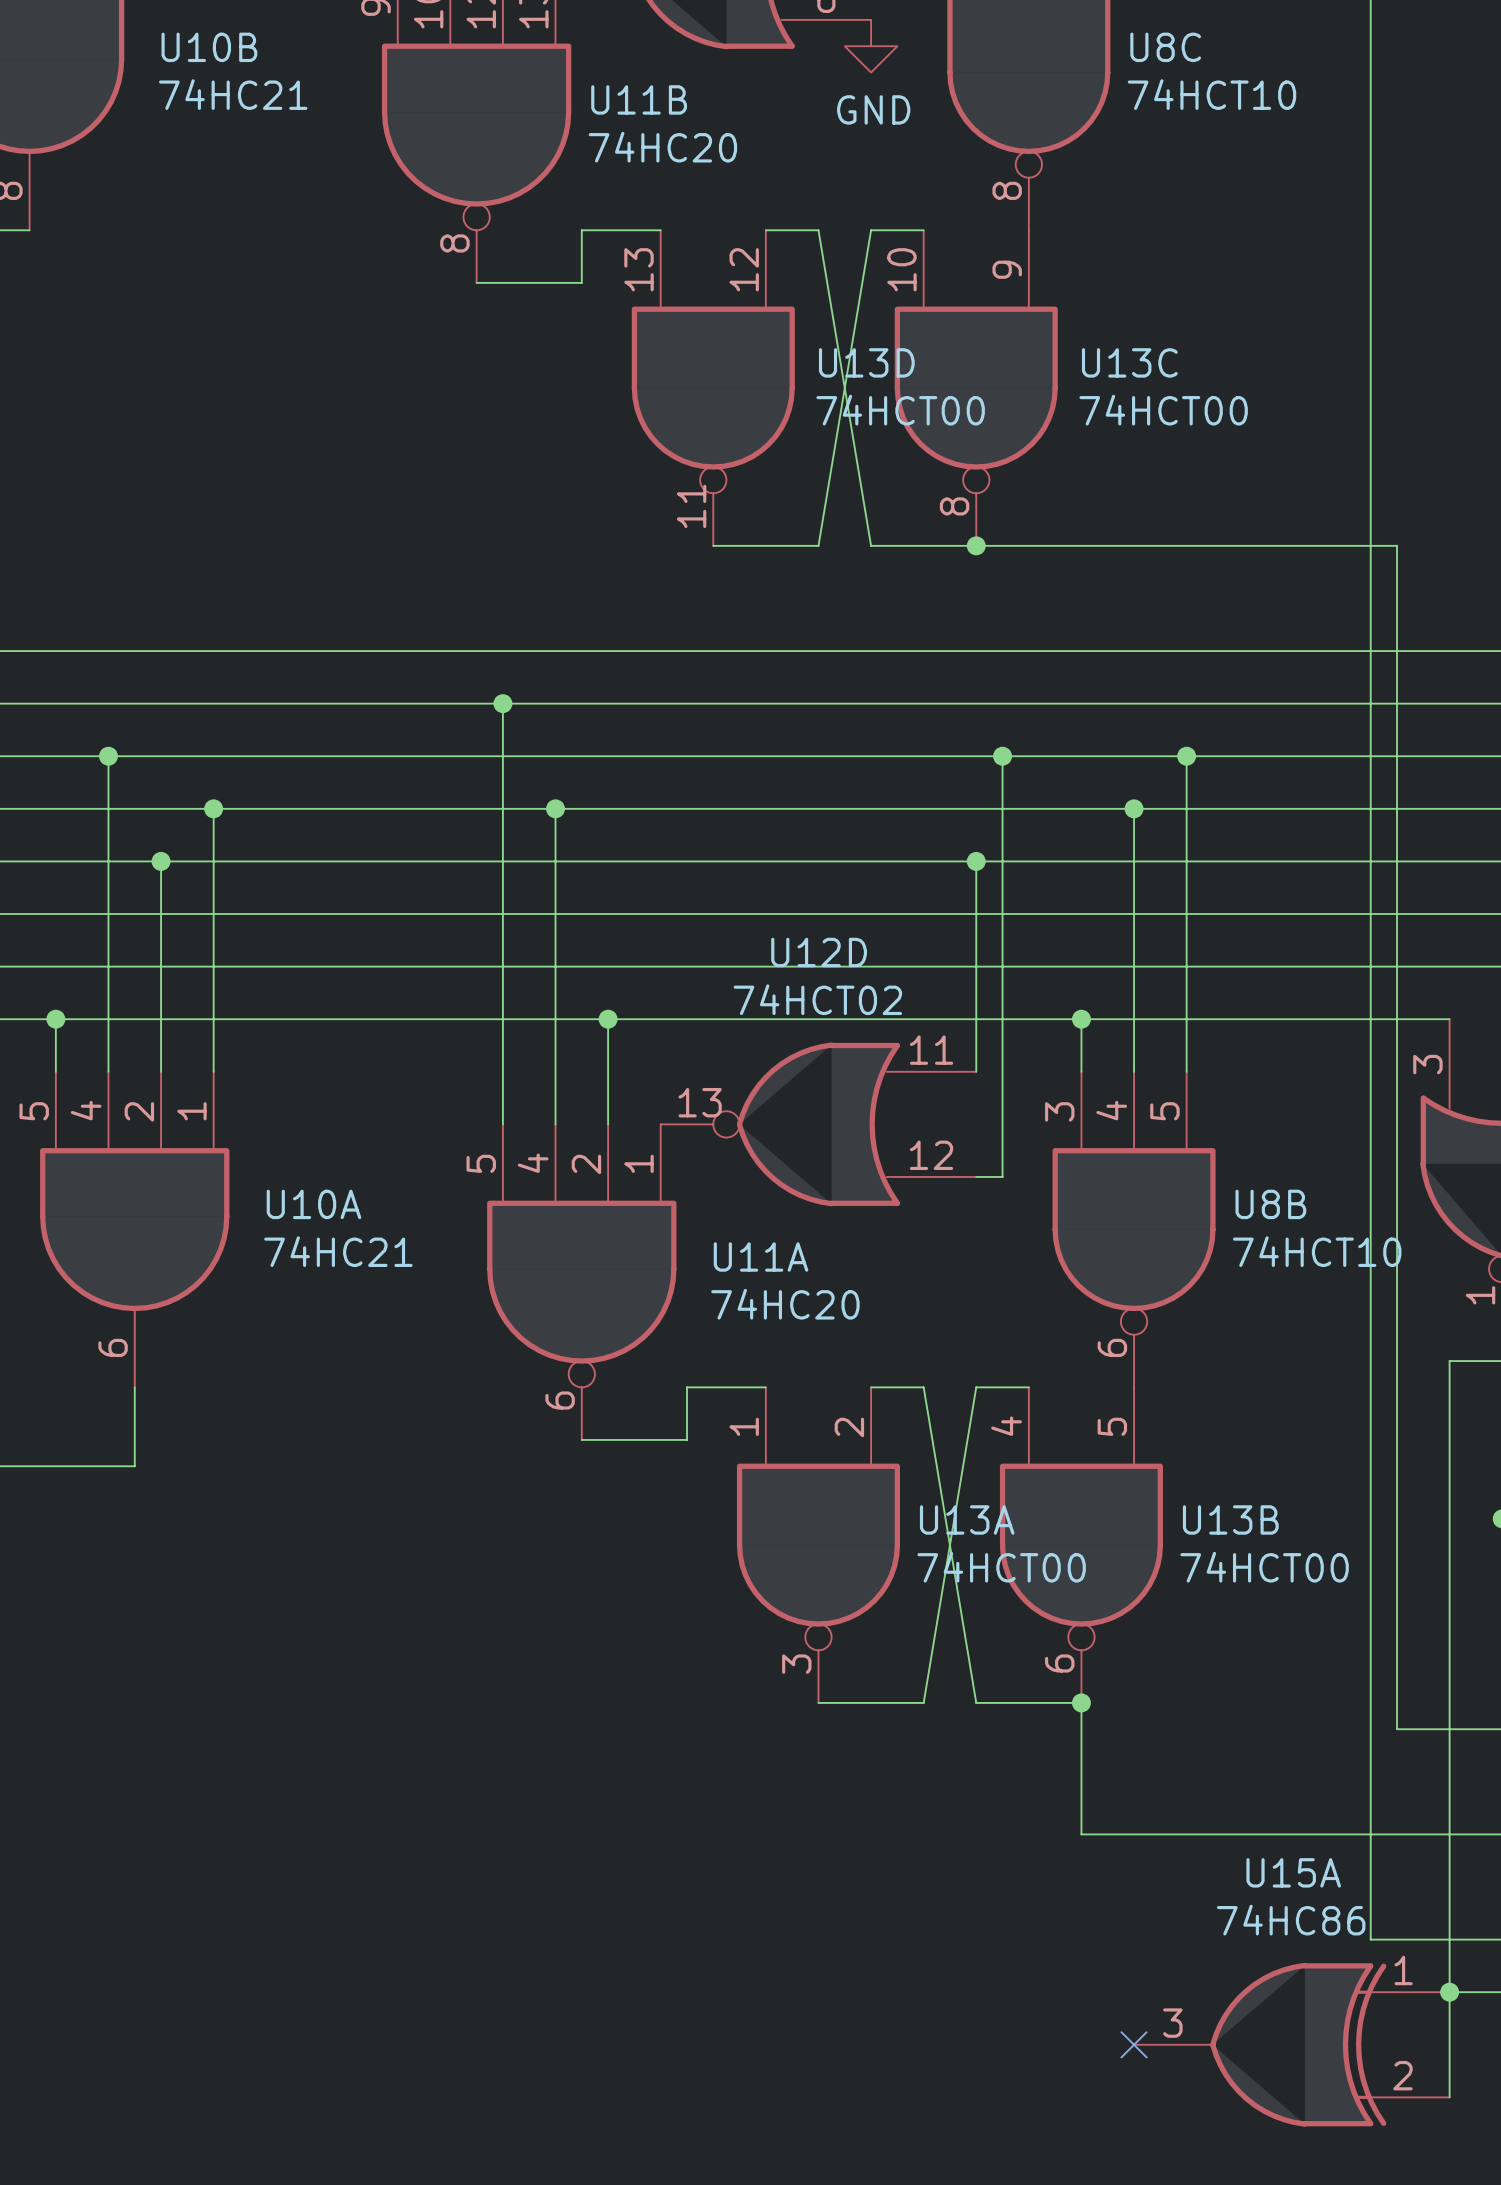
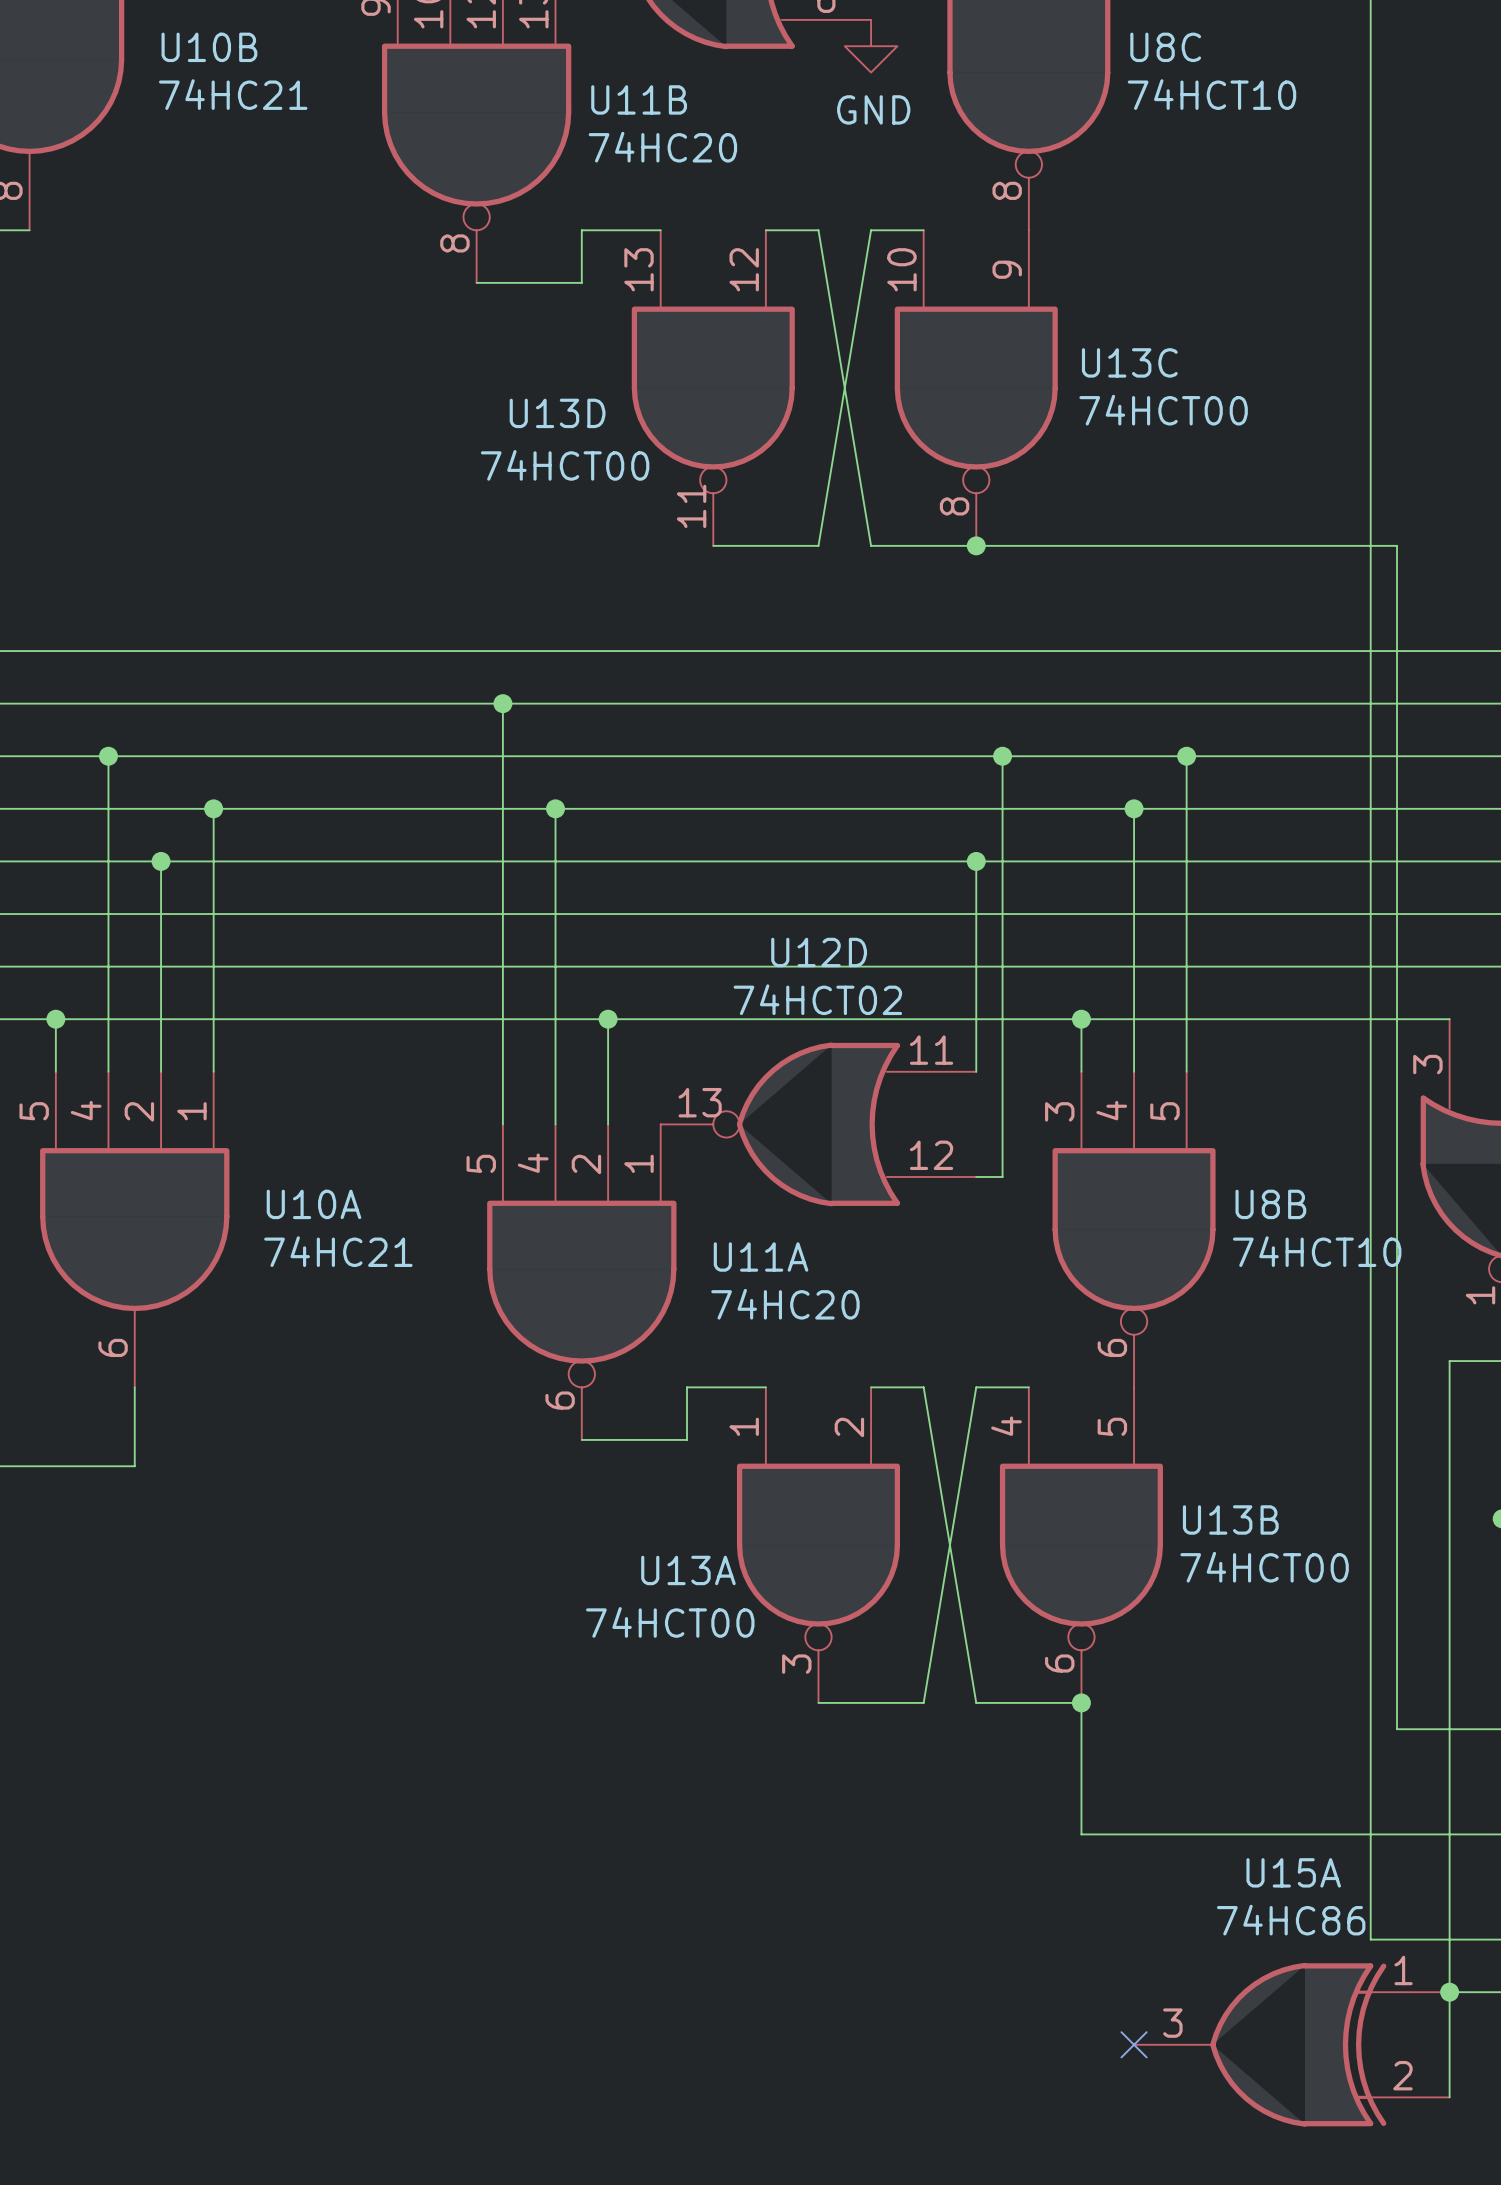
U13D name position: U13D (866, 362) -> U13D (557, 413)
U13D value position: 74HCT00 (900, 410) -> 74HCT00 (565, 465)
U13A name position: U13A (967, 1519) -> U13A (688, 1570)
U13A value position: 74HCT00 (1001, 1567) -> 74HCT00 (670, 1622)

